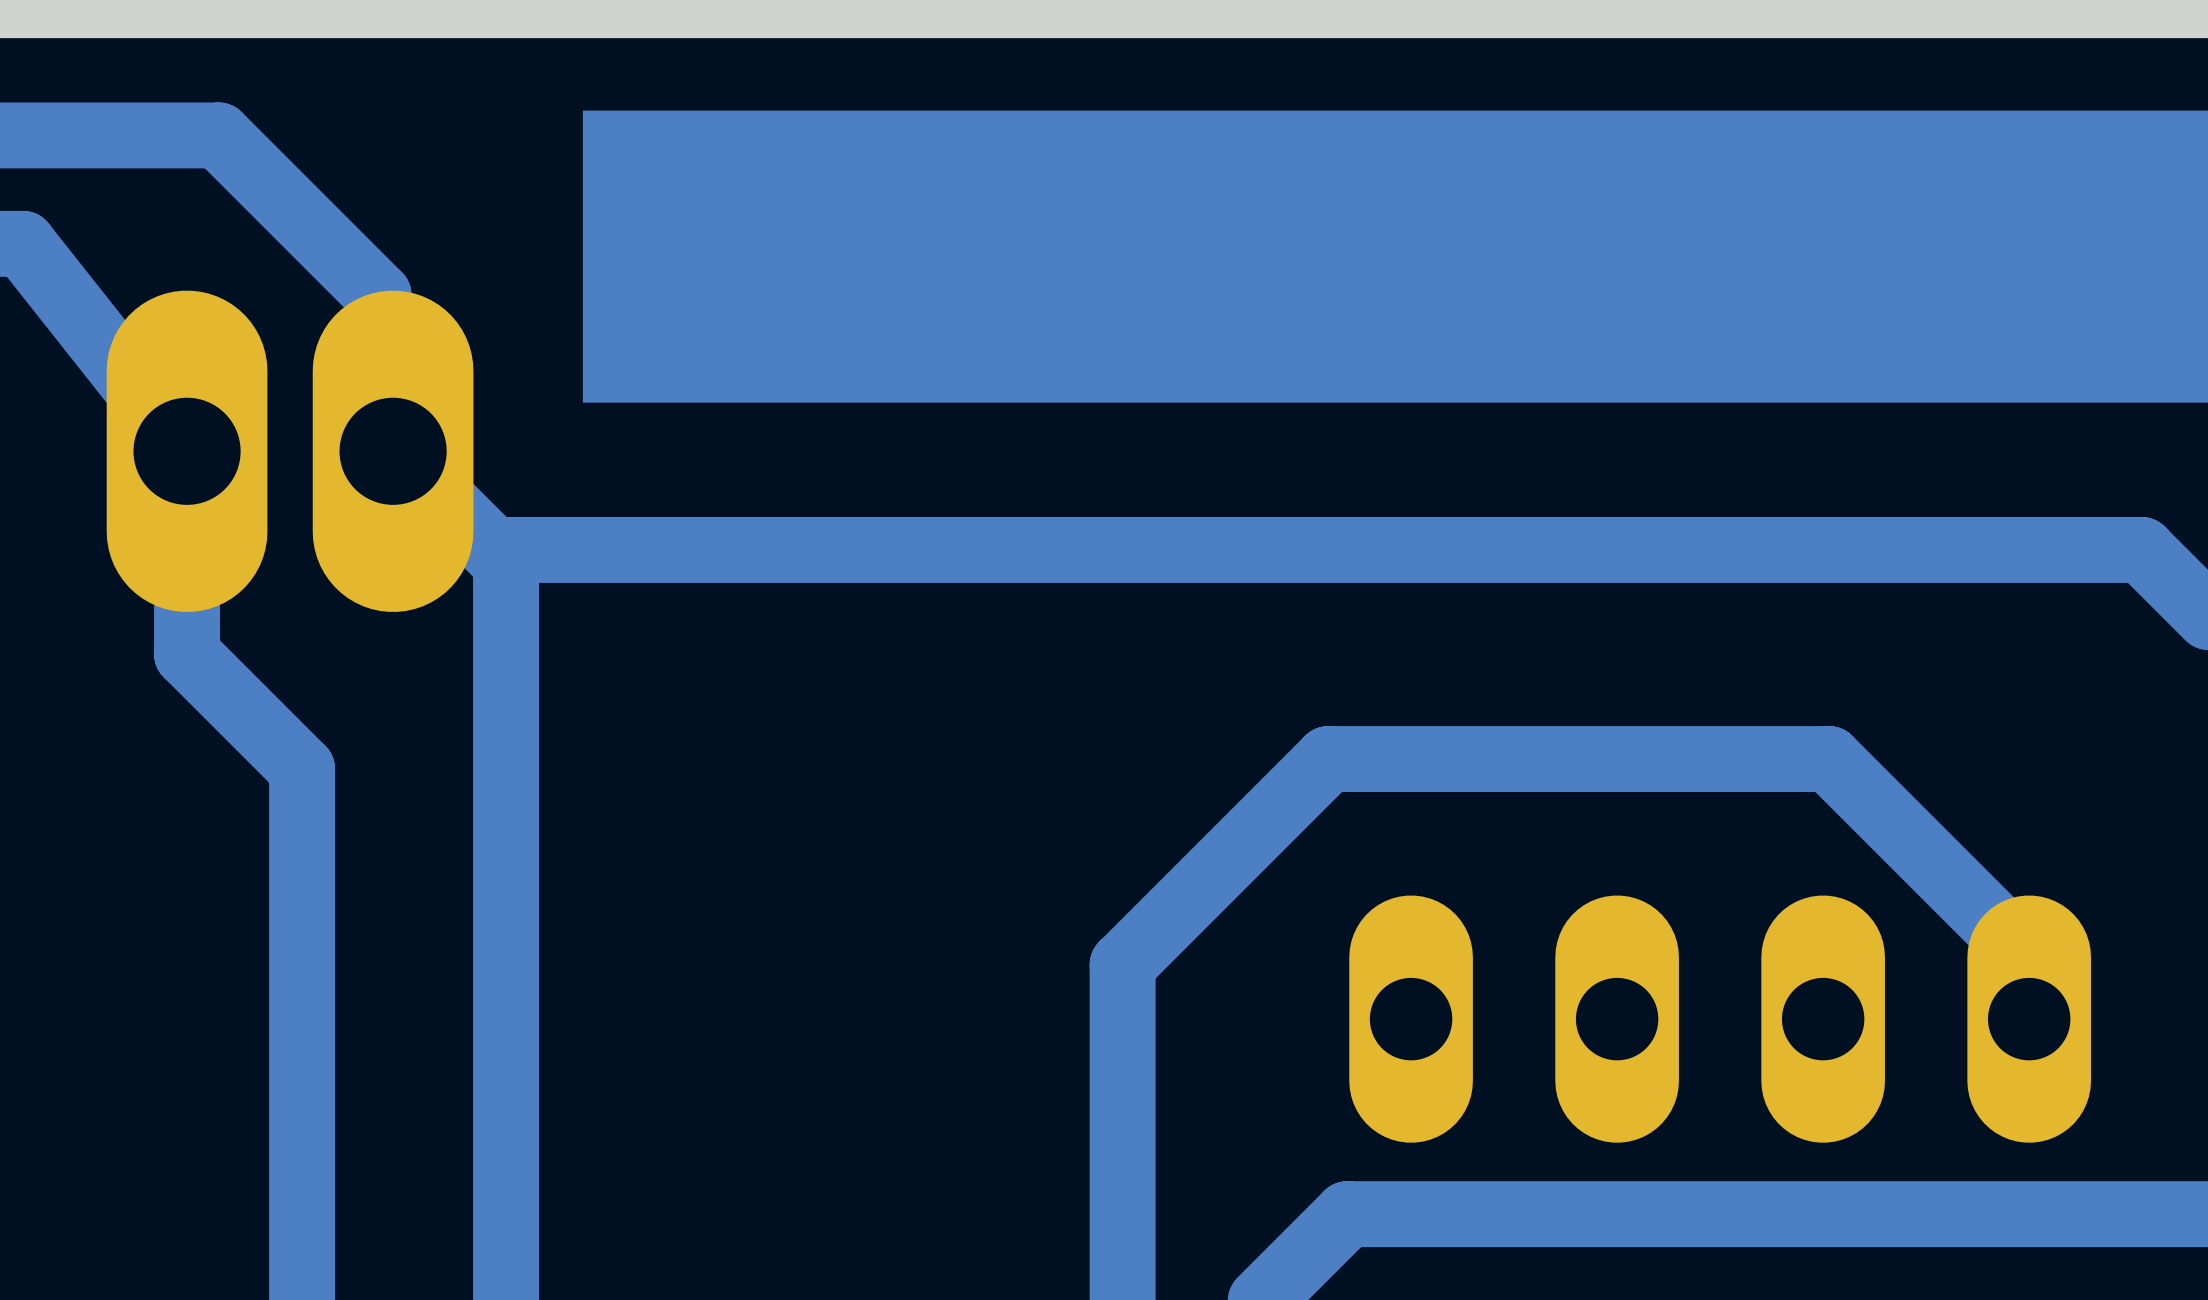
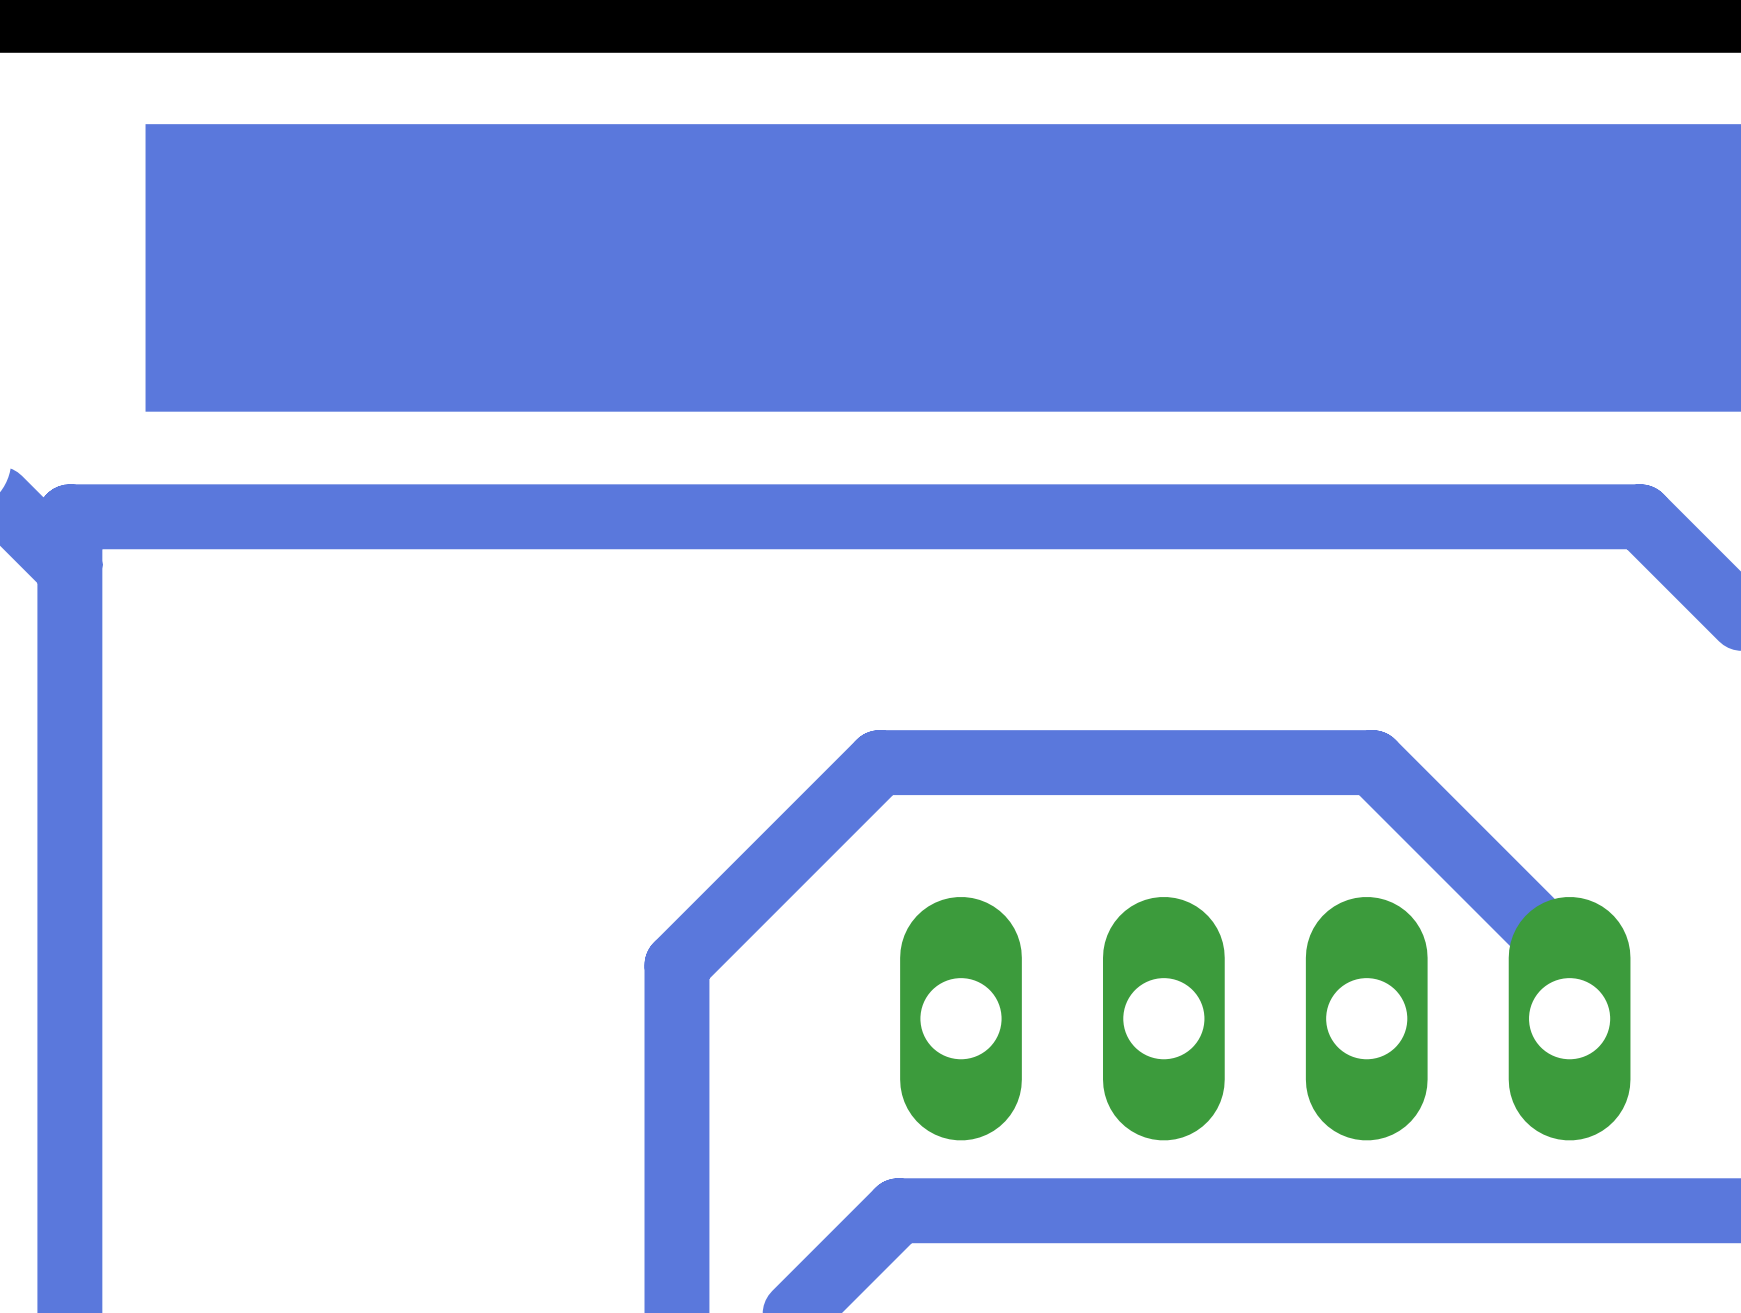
bottom track: (2141, 549) (506, 549) -> (1680, 556) (1640, 516) (69, 516) (69, 556)

